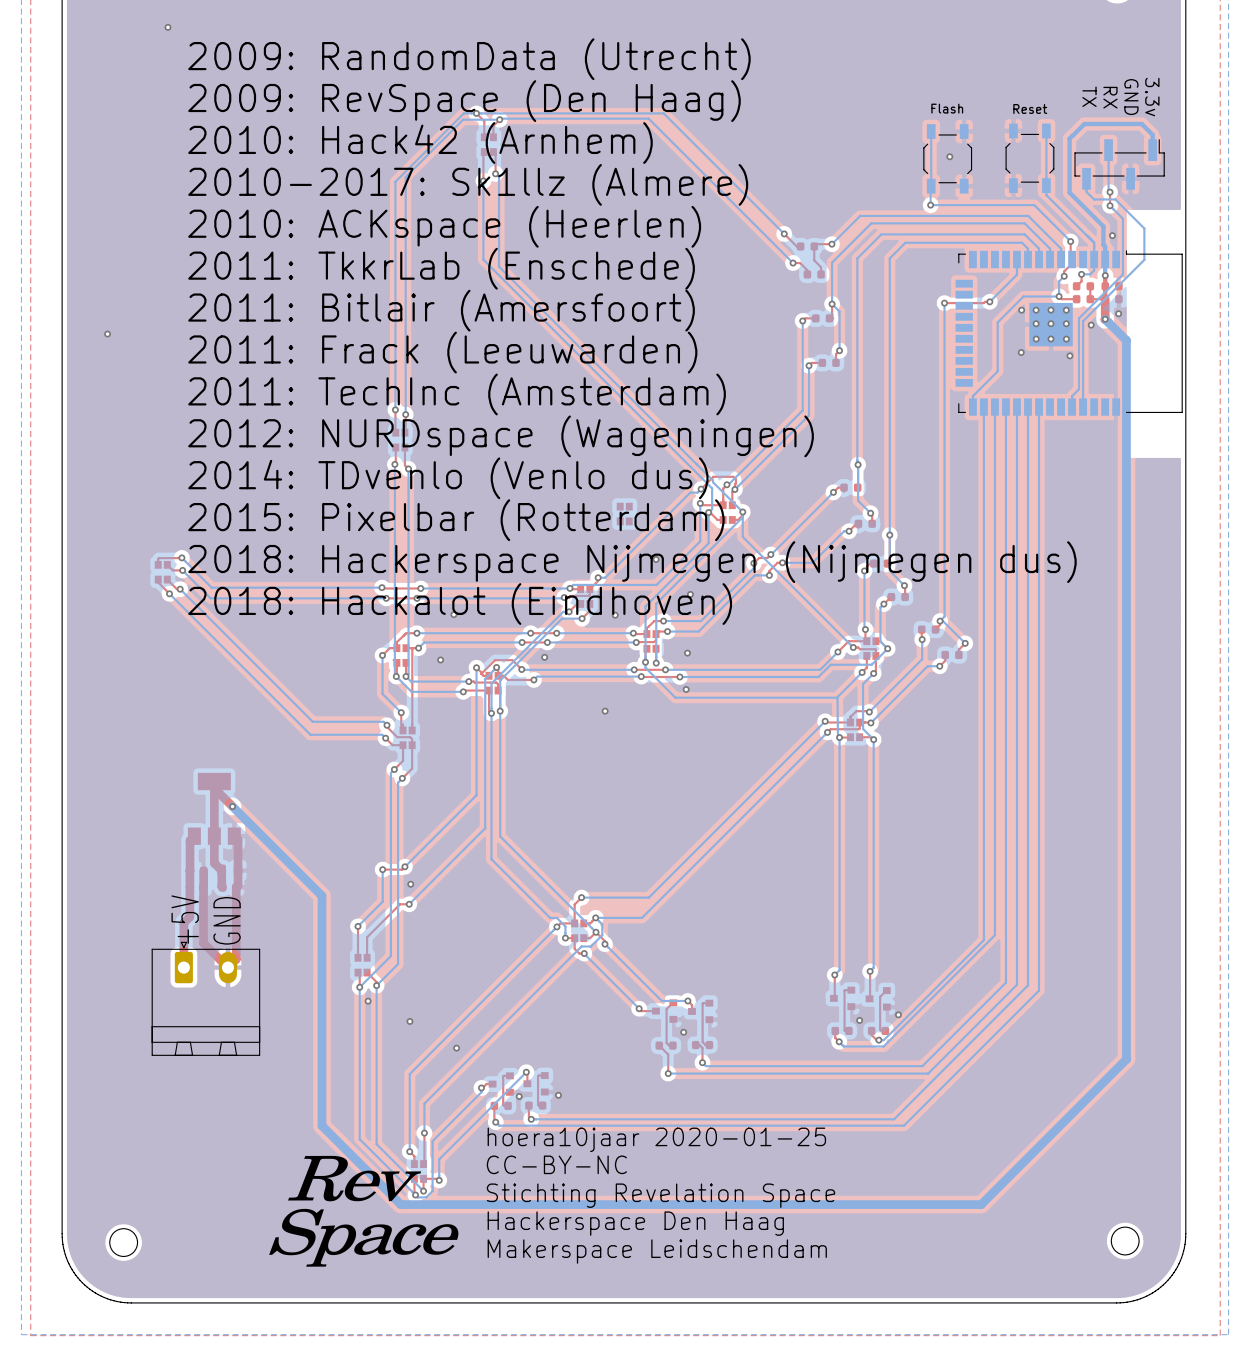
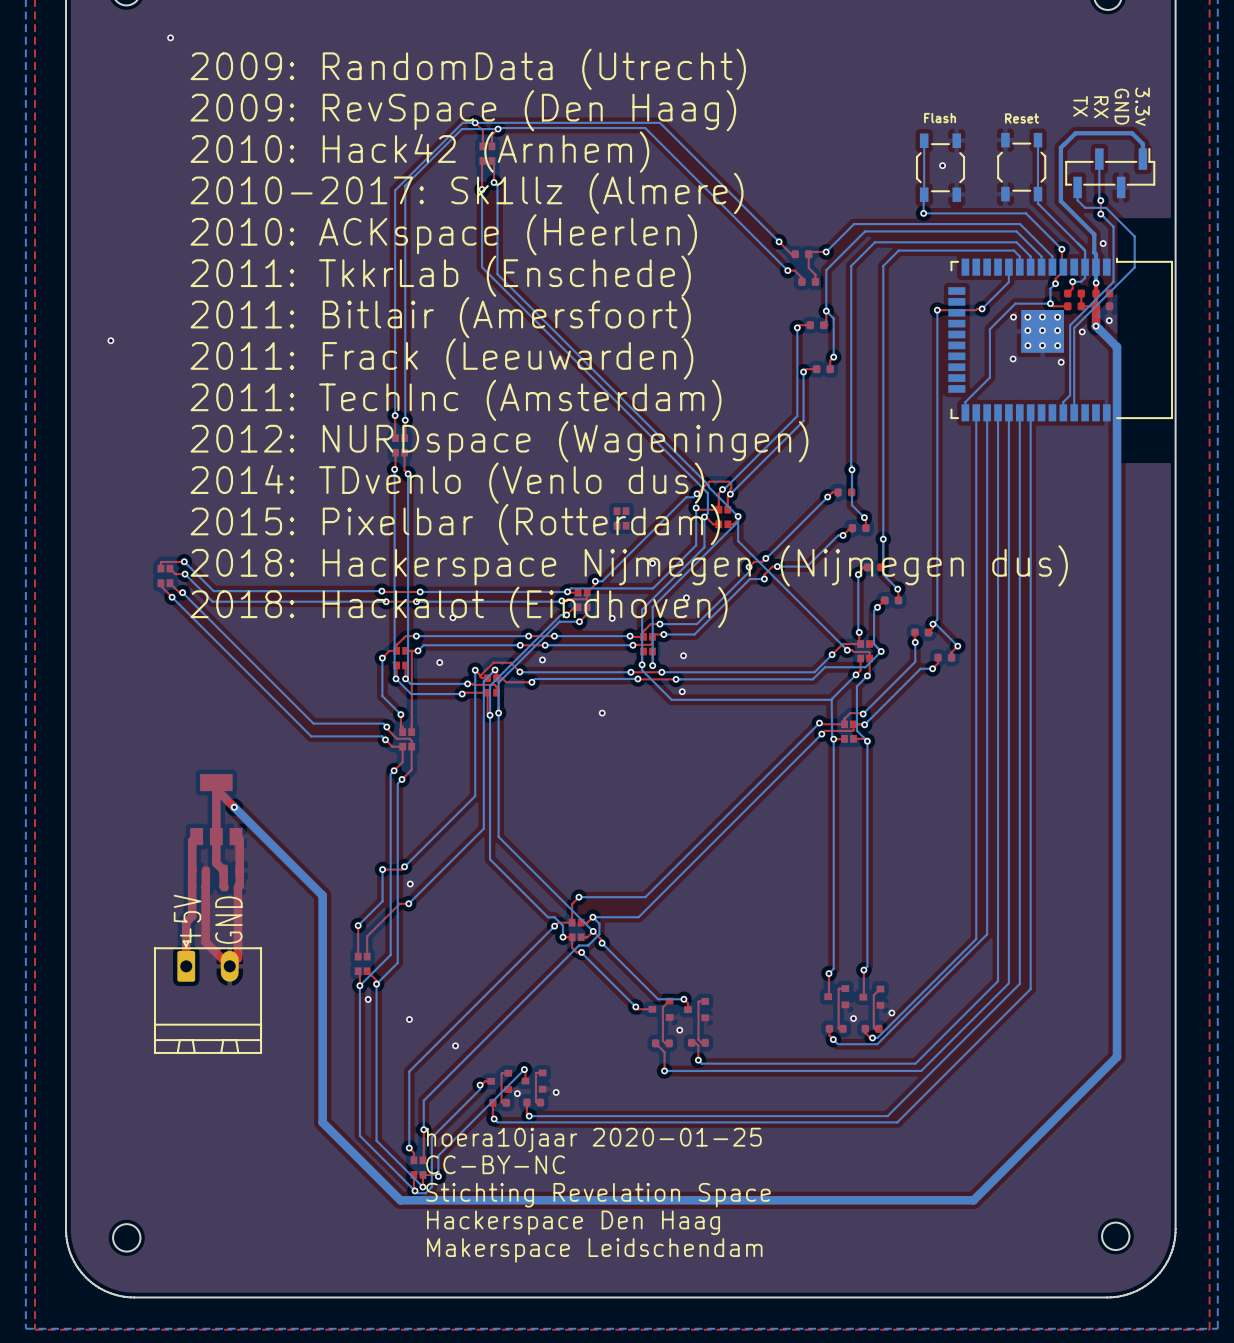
text position: hoera10jaar 2020-01-25 (656, 1139) -> hoera10jaar 2020-01-25 (594, 1140)
drawing: [269, 1155, 459, 1267] -> none
text position: CC-BY-NC (556, 1164) -> CC-BY-NC (495, 1164)
text position: Stichting Revelation Space (660, 1195) -> Stichting Revelation Space (598, 1195)
text position: Hackerspace Den Haag (635, 1223) -> Hackerspace Den Haag (573, 1222)
text position: Makerspace Leidschendam (657, 1251) -> Makerspace Leidschendam (594, 1250)

